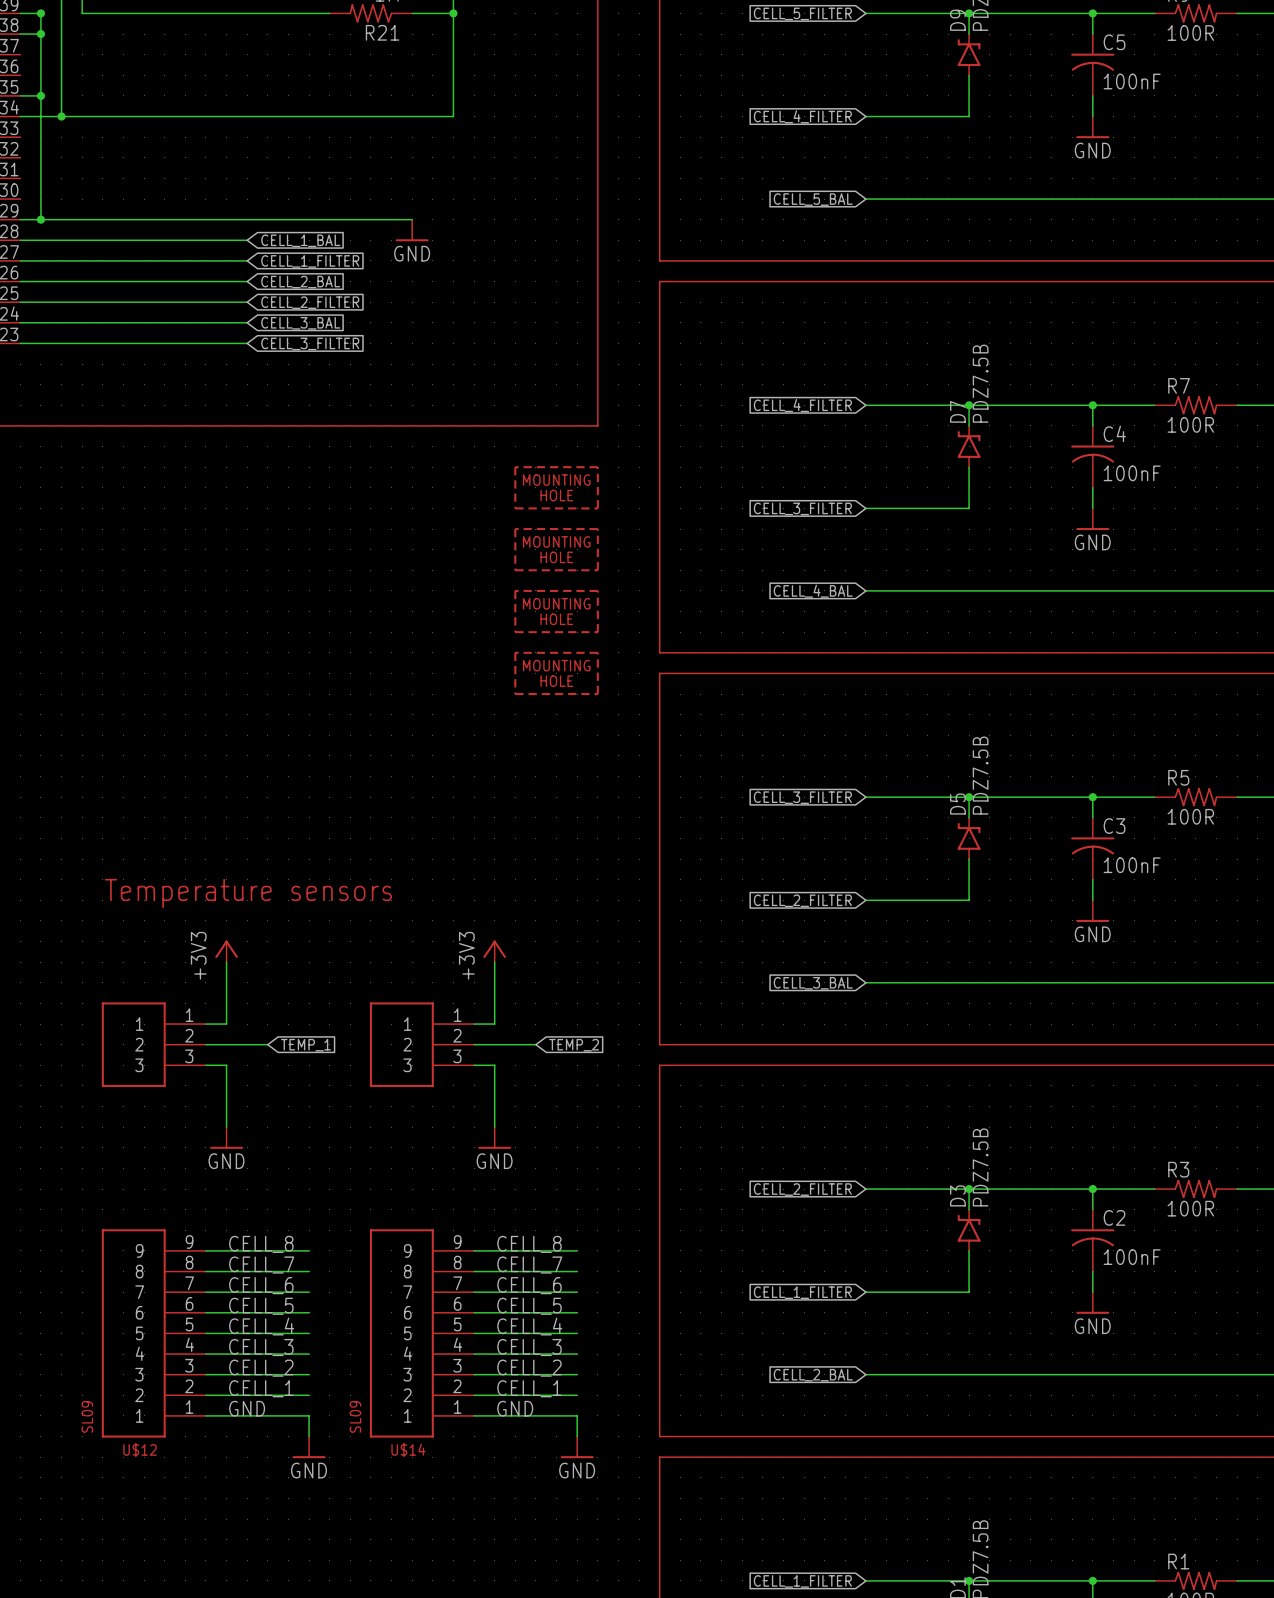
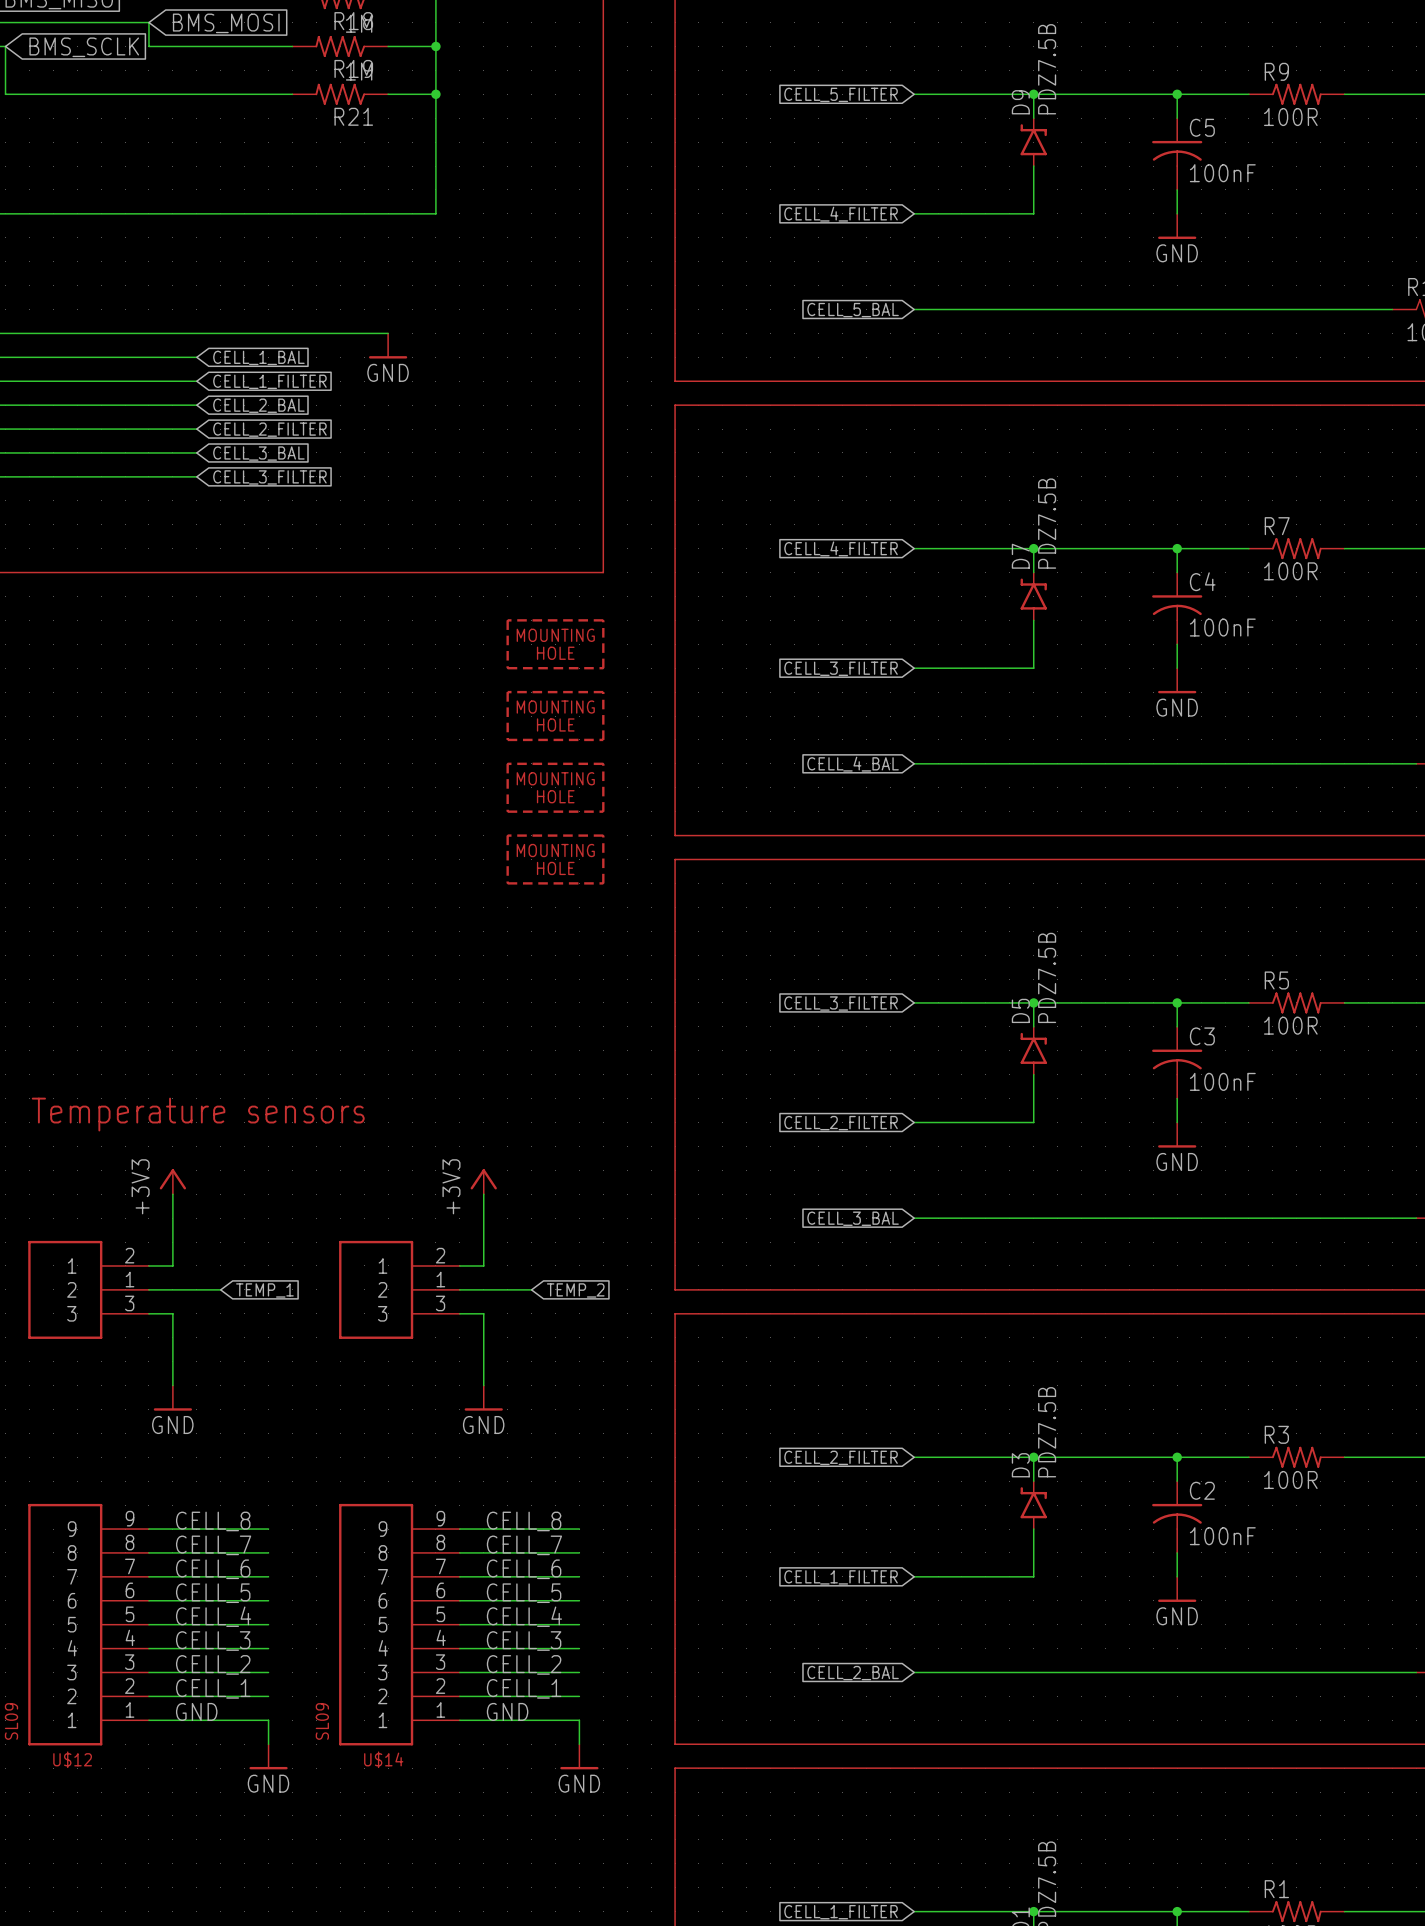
part pin number: 1 (189, 1015) -> 2 (129, 1255)
part pin number: 1 (457, 1015) -> 2 (440, 1255)
part pin number: 2 (189, 1035) -> 1 (130, 1279)
part pin number: 2 (457, 1035) -> 1 (440, 1279)

